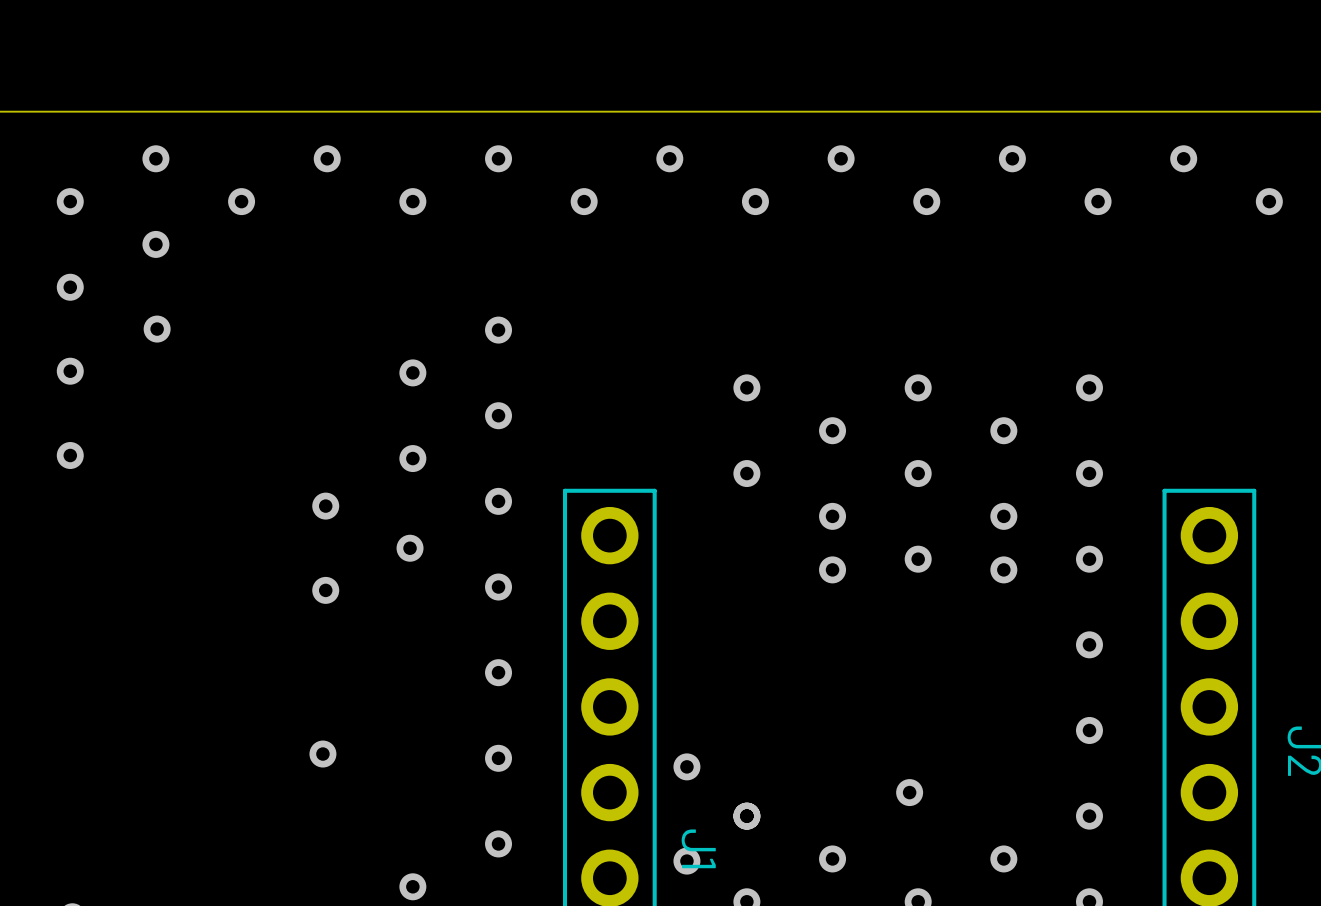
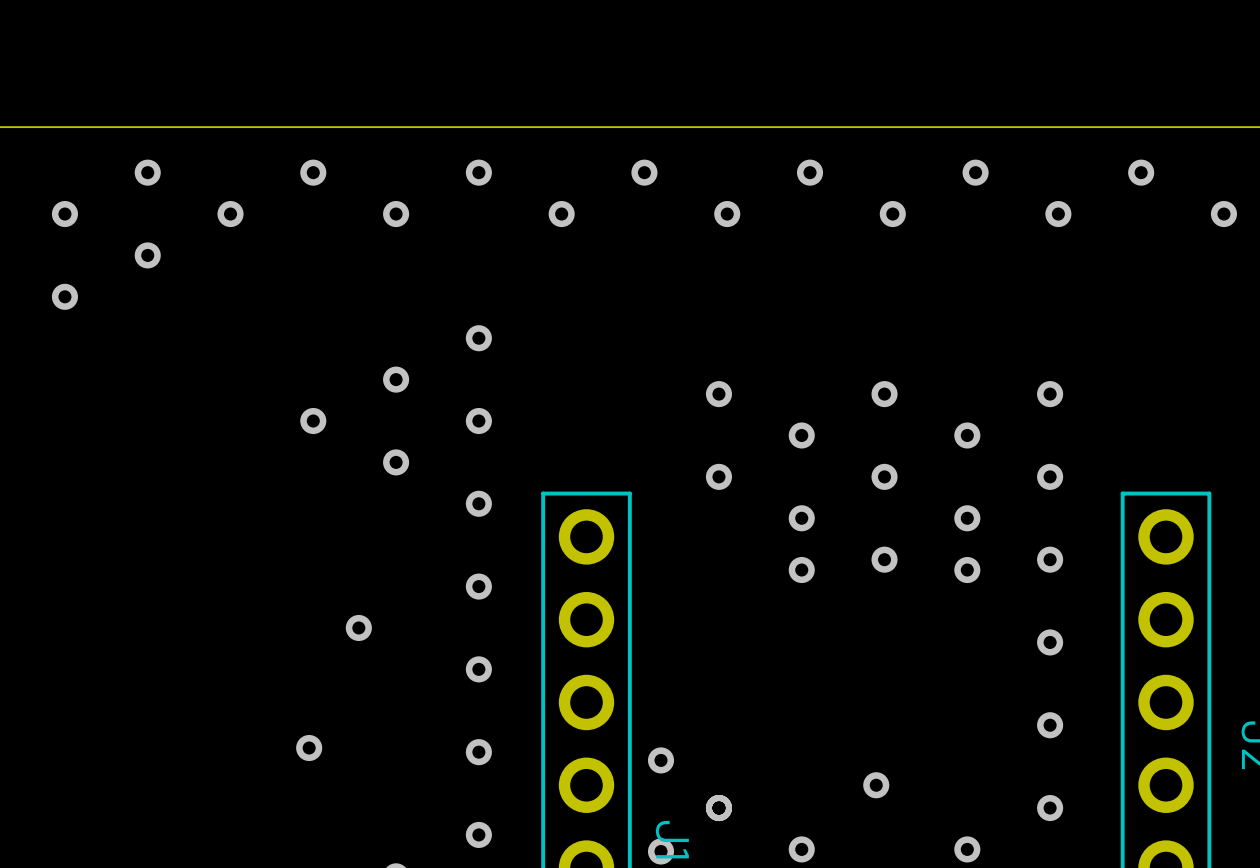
via: (157, 329) -> none
via: (70, 371) -> none
via: none -> (313, 421)
via: (70, 455) -> none
via: (325, 506) -> none
via: (410, 548) -> none
via: (325, 590) -> none
via: none -> (358, 627)

